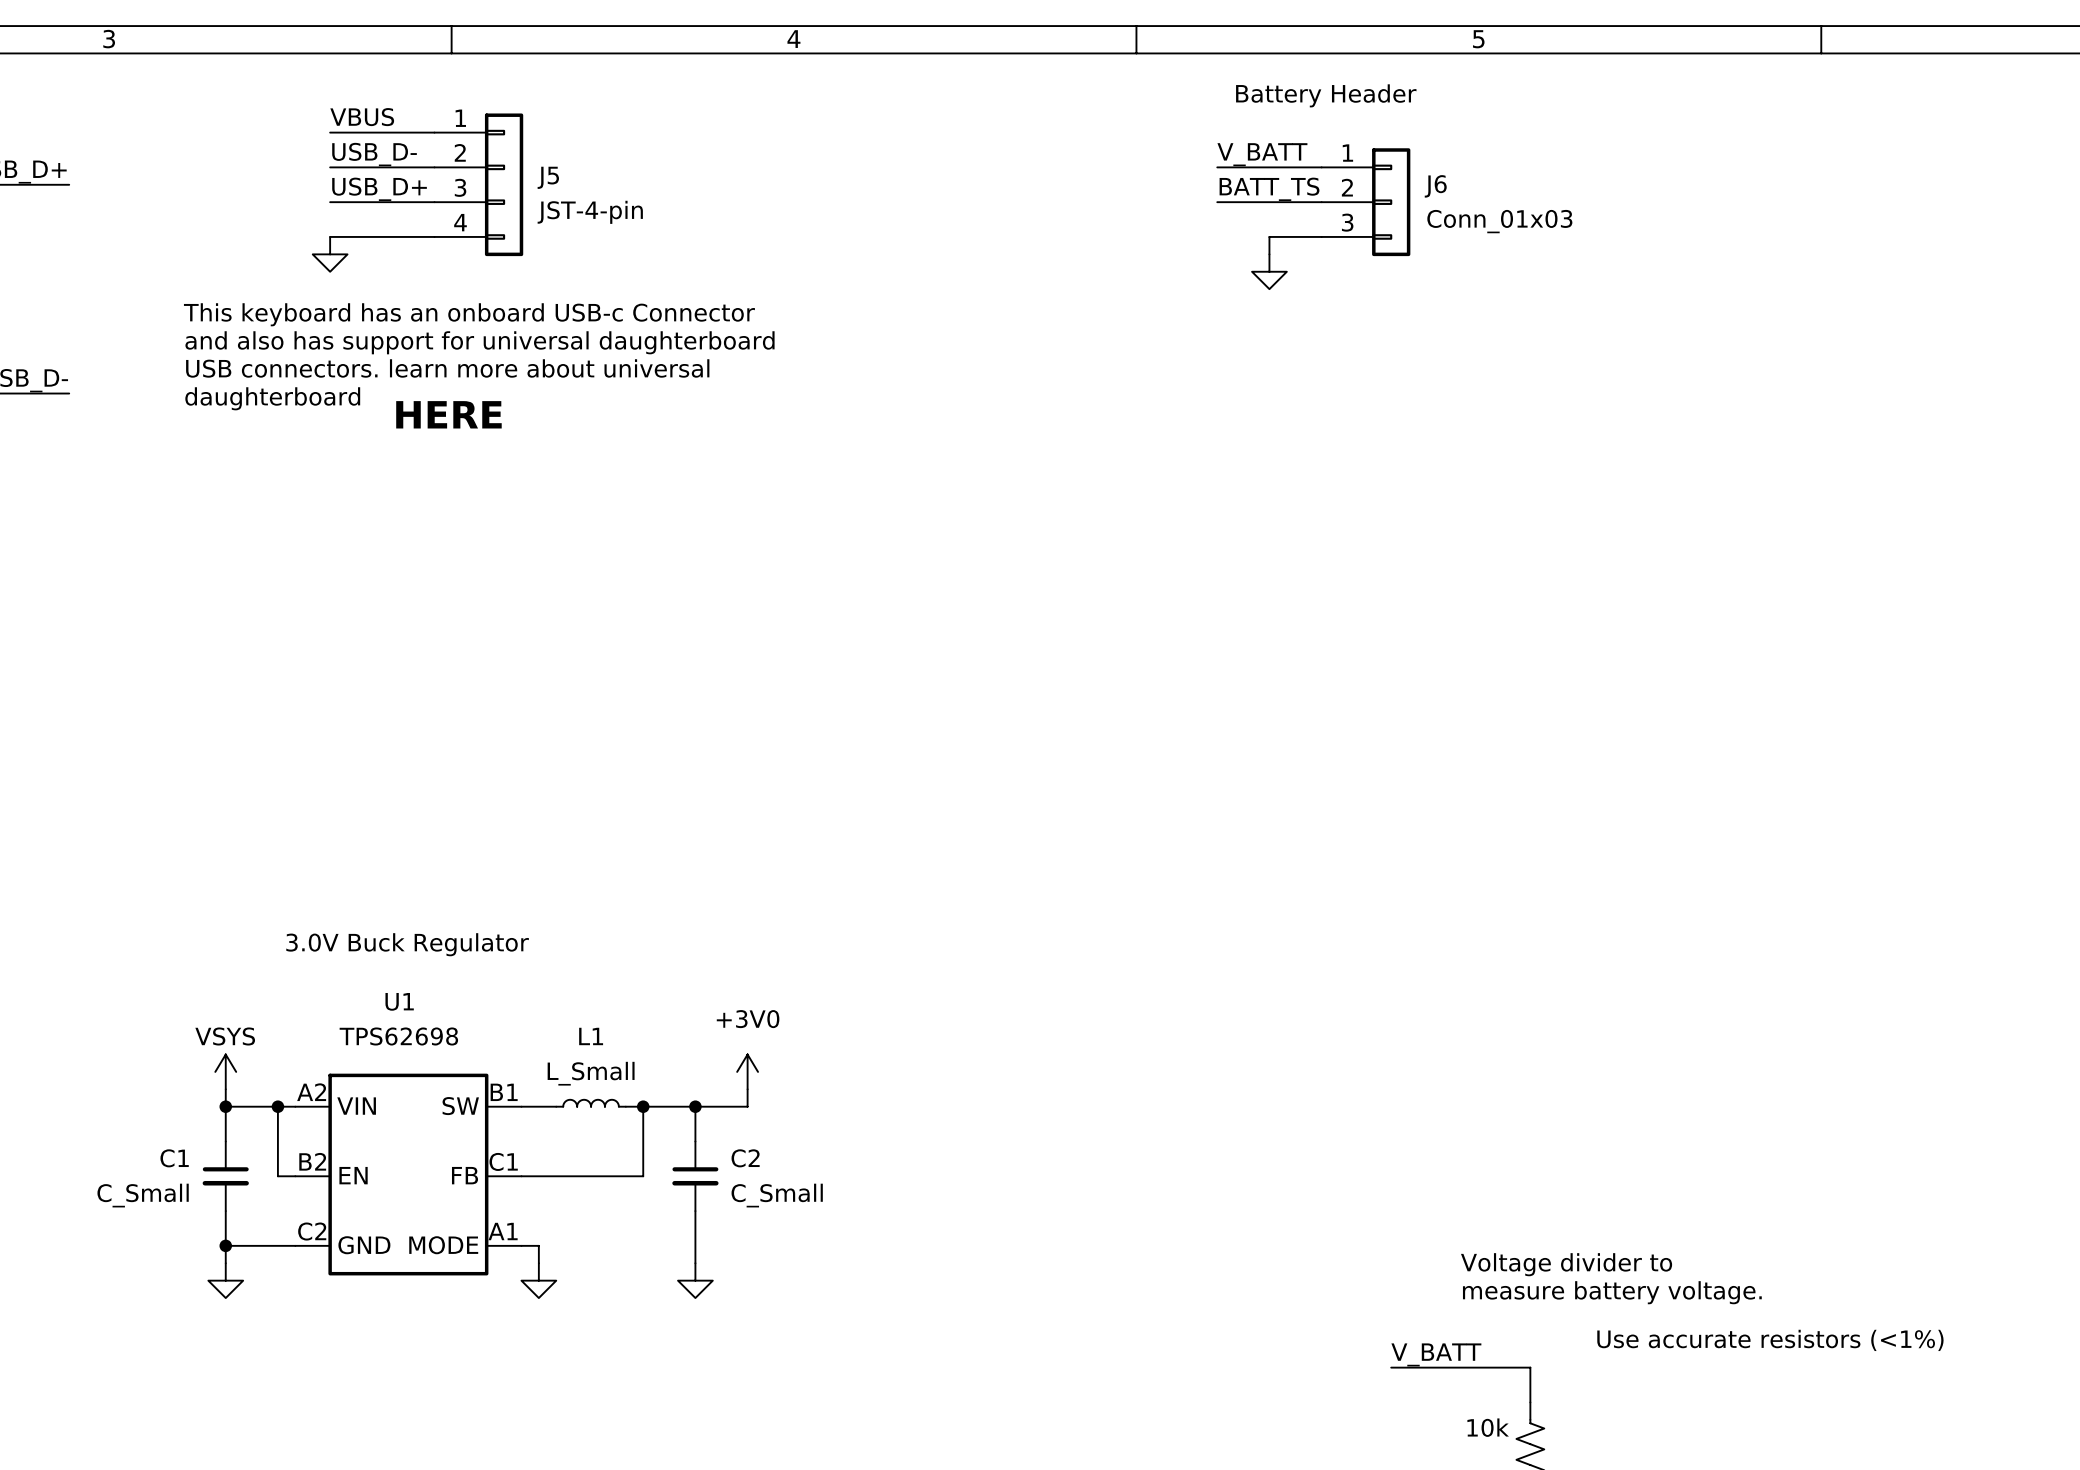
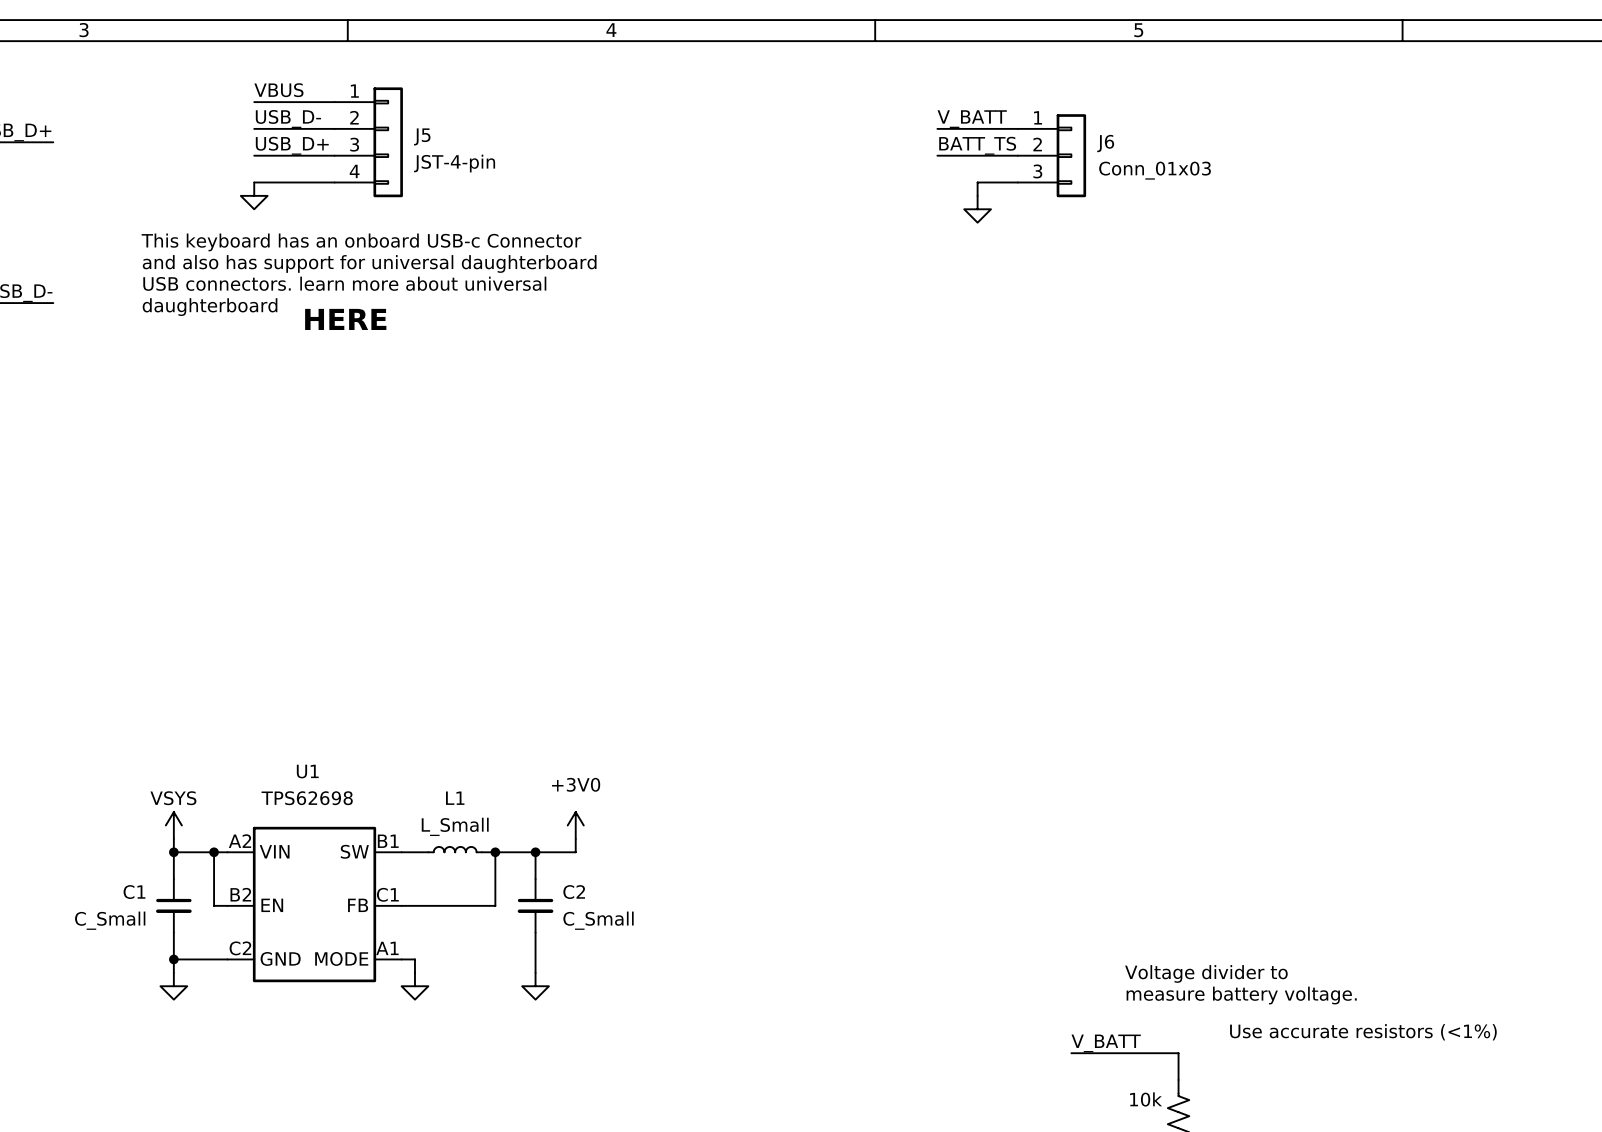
text: Battery Header (1326, 95) -> none
text: 3.0V Buck Regulator (407, 944) -> none

